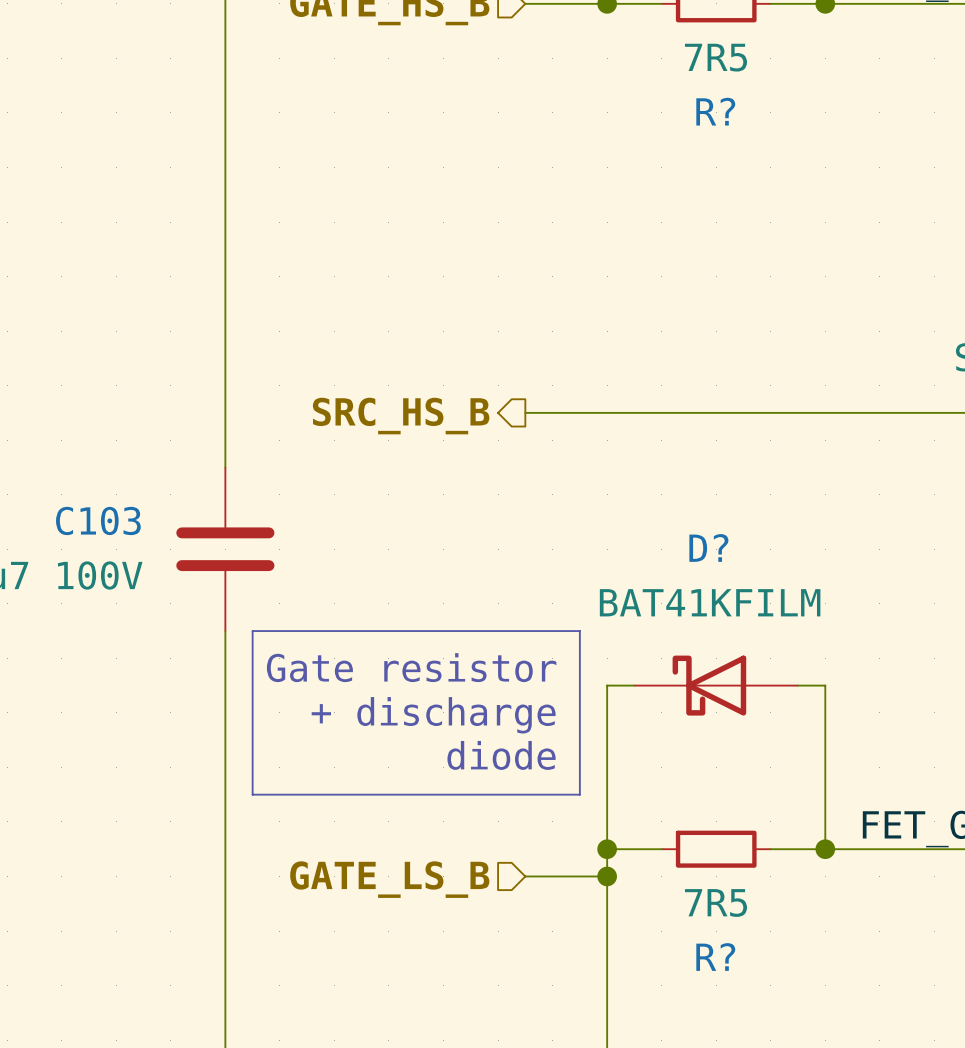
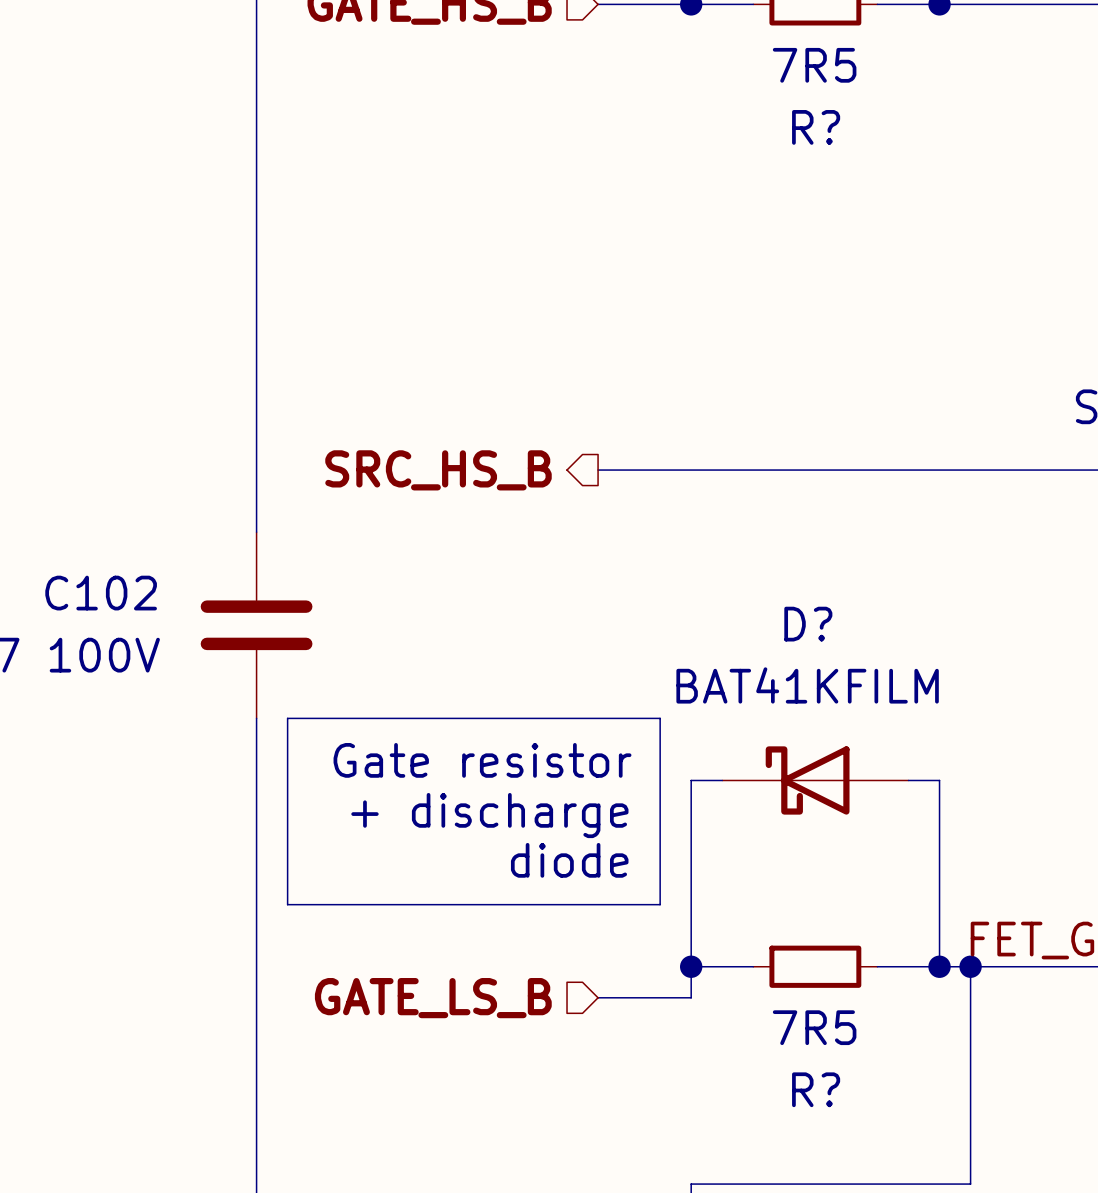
C103 name: C103 (98, 520) -> C102 (101, 593)
junction: none -> (970, 966)
wire: (607, 876) (607, 1040) -> (970, 966) (970, 1184) (691, 1184)
junction: (607, 876) -> none

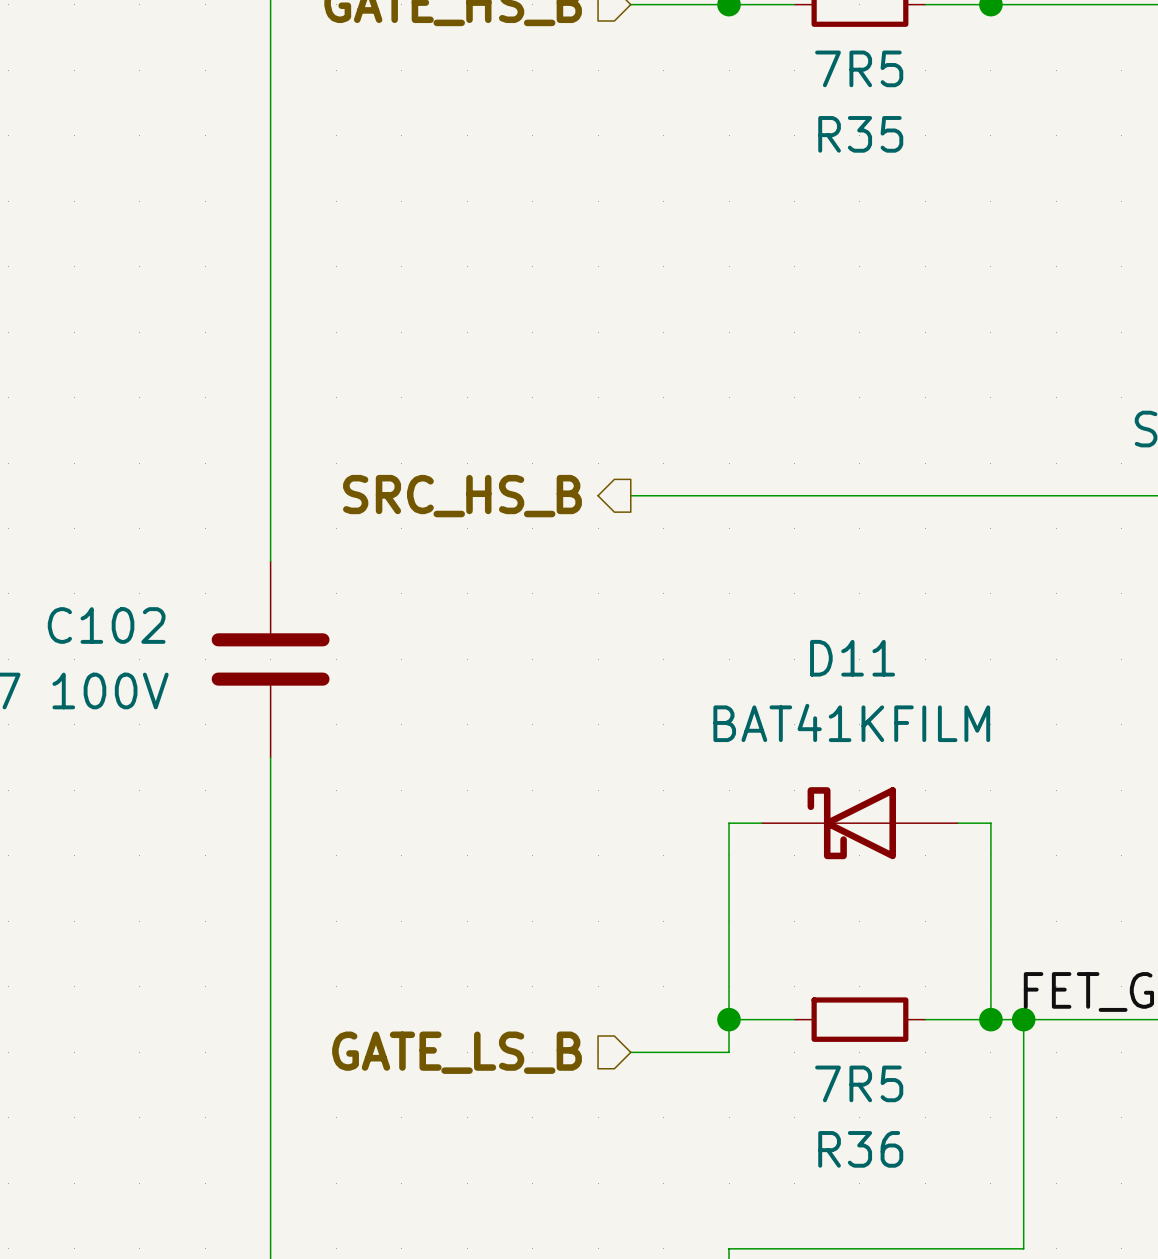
R? name: R? (816, 127) -> R35 (860, 134)
D? name: D? (808, 624) -> D11 (852, 658)
line: (287, 718) (660, 718) (660, 904) (287, 904) (287, 718) -> none
text: Gate resistor (482, 760) -> none
text: + discharge (489, 815) -> none
text: diode (569, 860) -> none
R? name: R? (816, 1089) -> R36 (860, 1149)

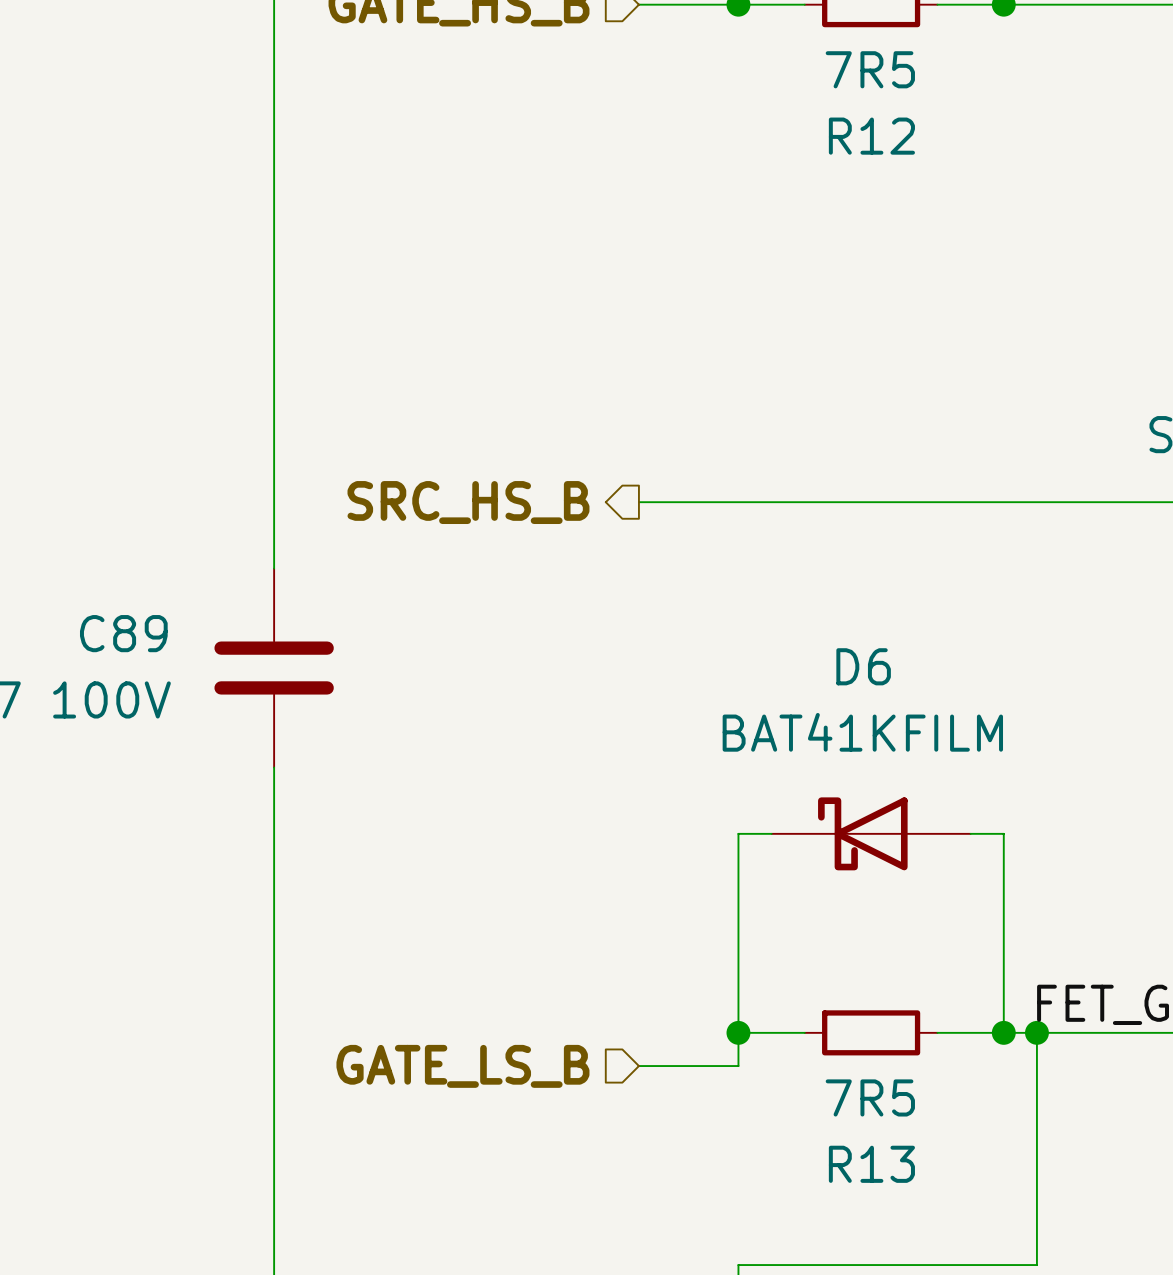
R35 name: R35 (860, 134) -> R12 (871, 136)
C102 name: C102 (106, 625) -> C89 (123, 633)
D11 name: D11 (852, 658) -> D6 (863, 666)
R36 name: R36 (860, 1149) -> R13 (871, 1164)

